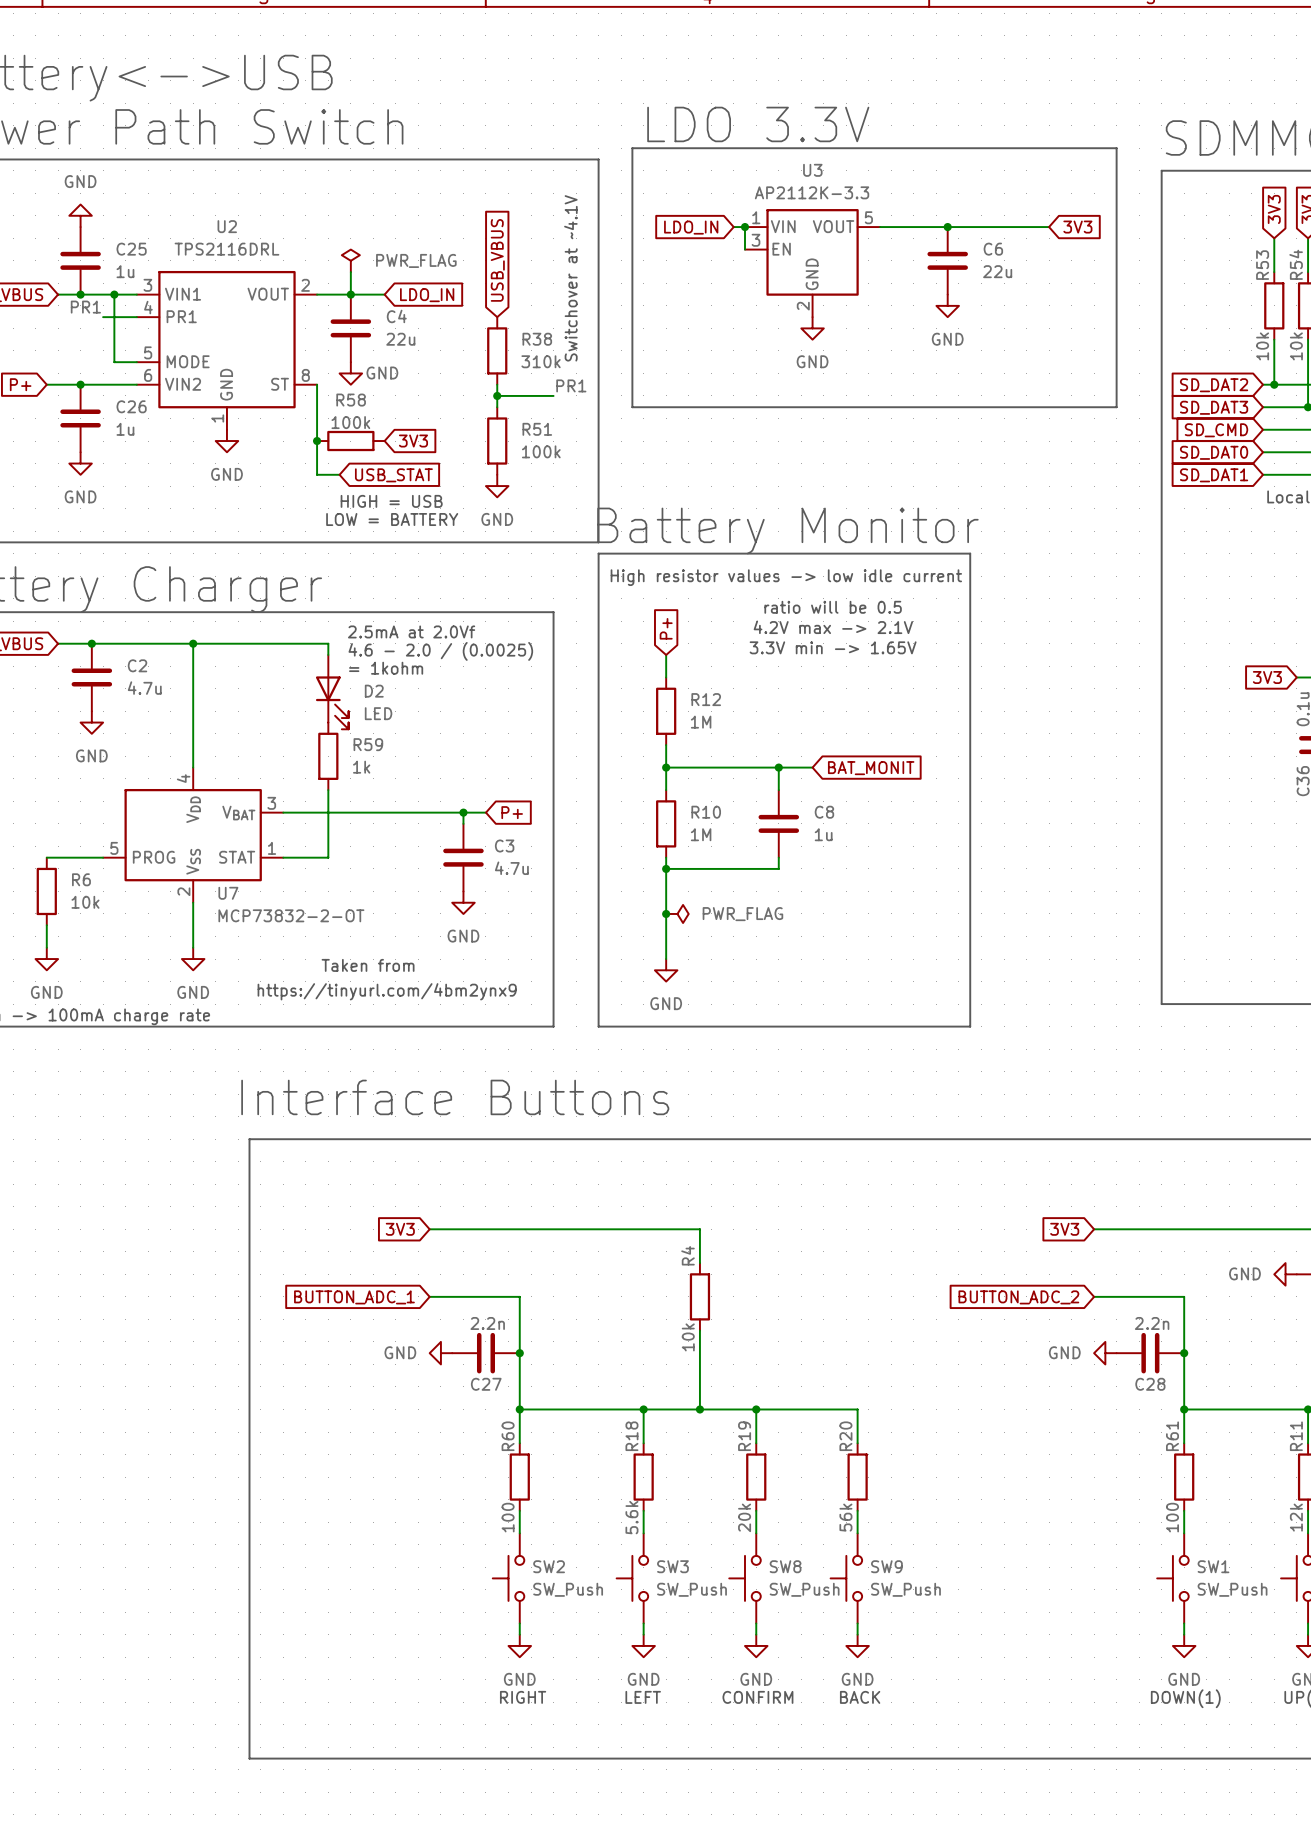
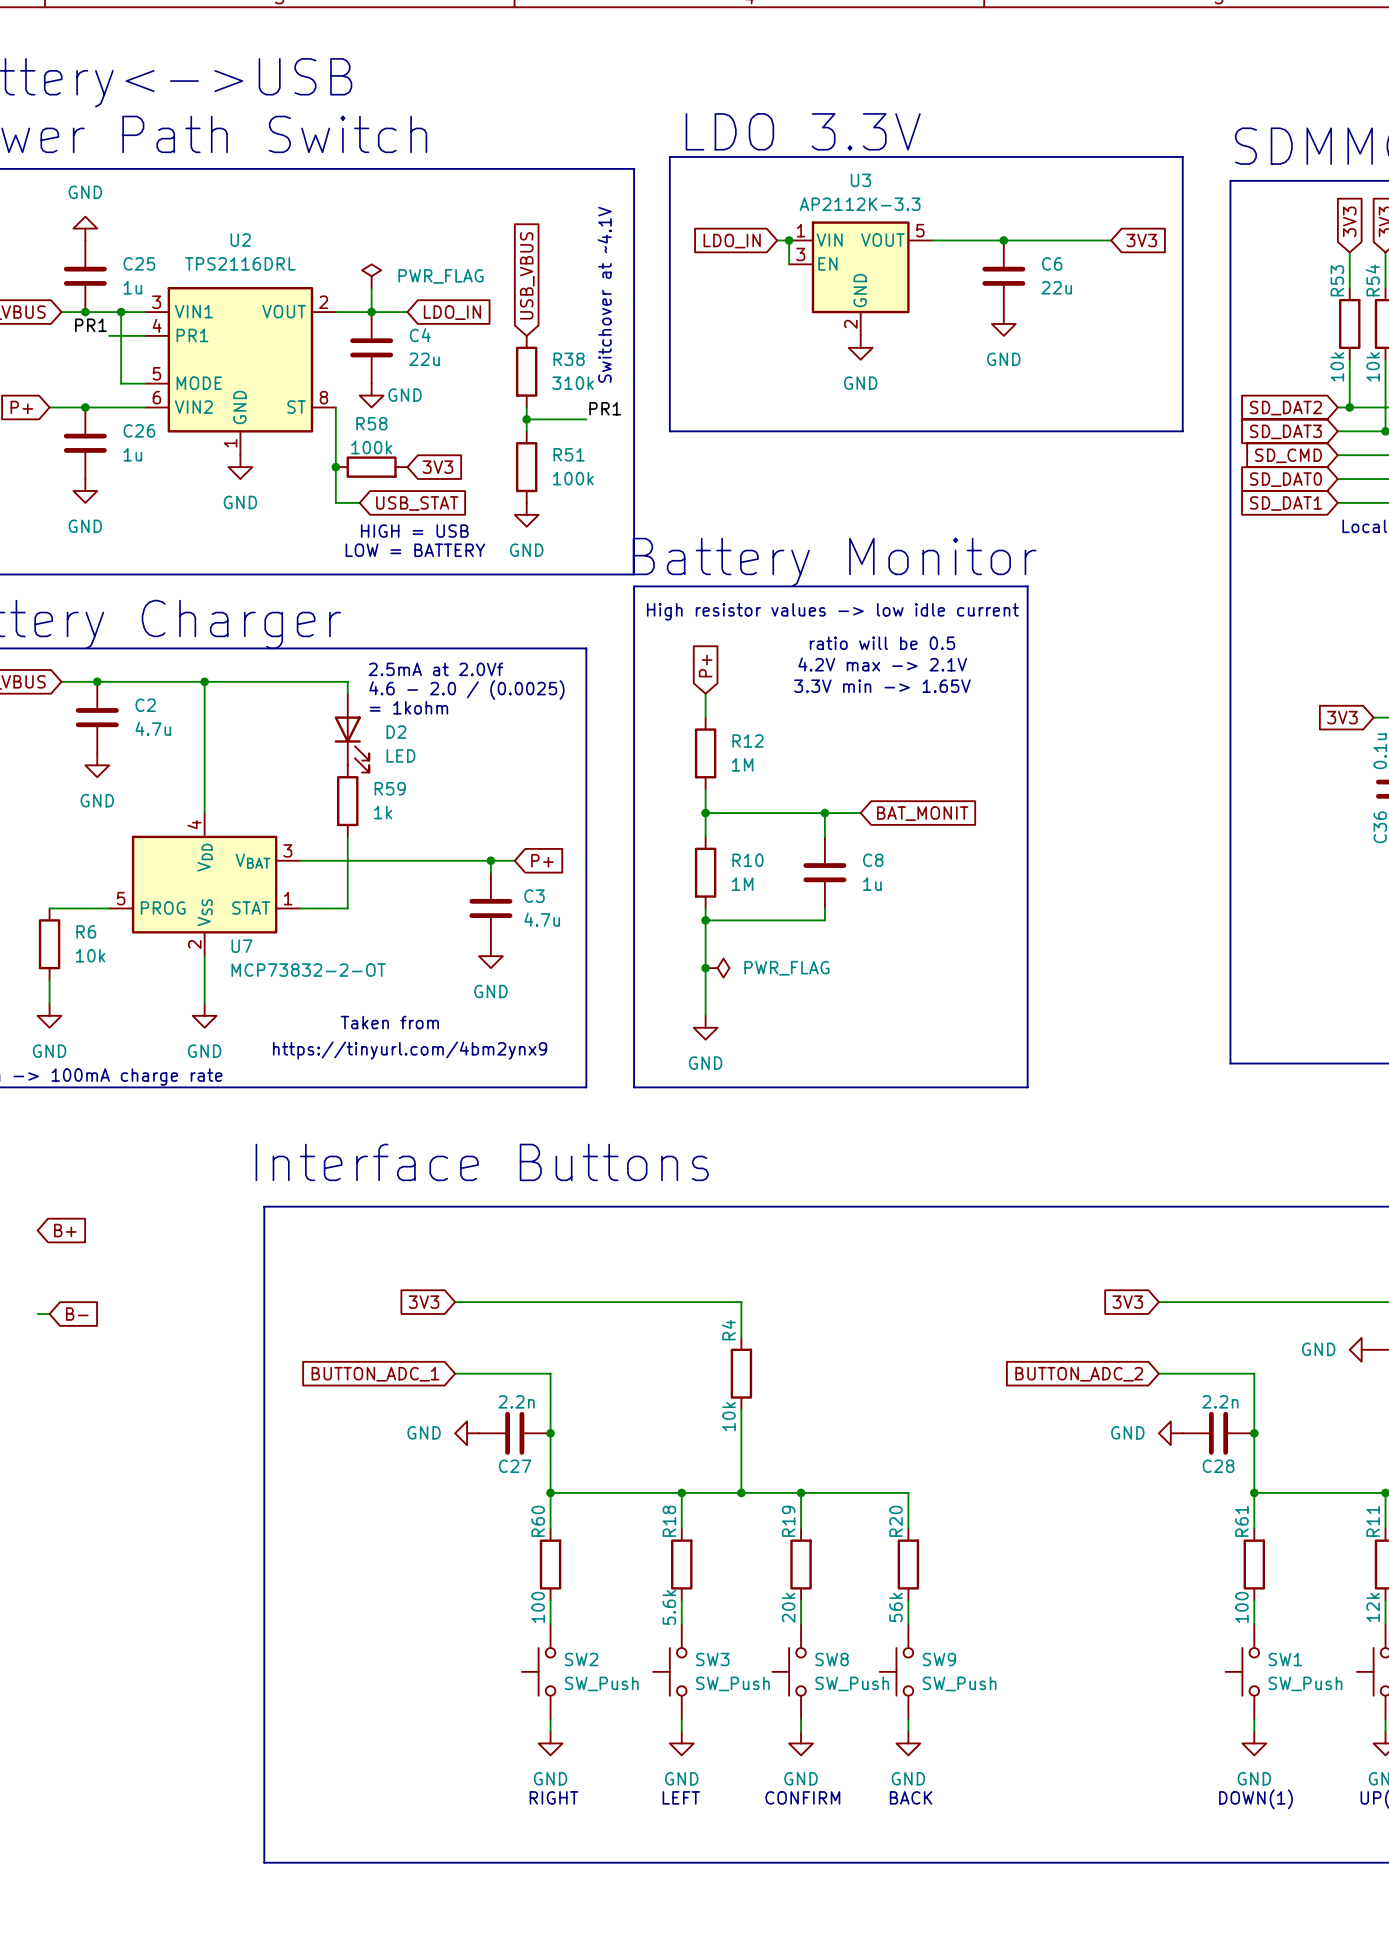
global label: none -> B+ (65, 1230)
wire: none -> (37, 1314) (49, 1314)
global label: none -> B- (77, 1314)

